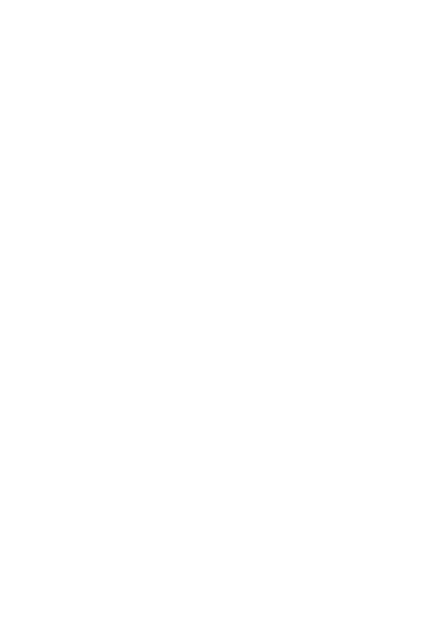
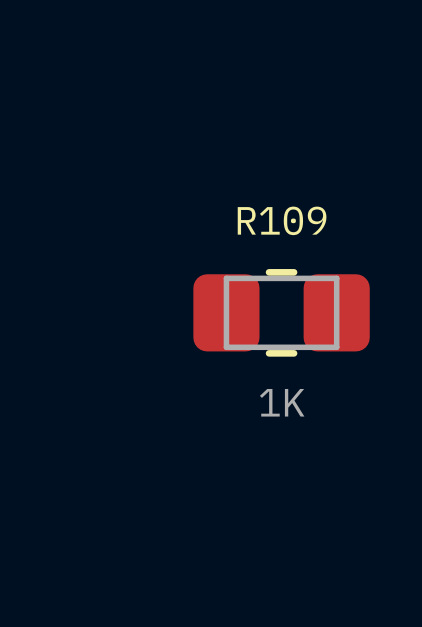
R109: none -> 1K (281, 312)

